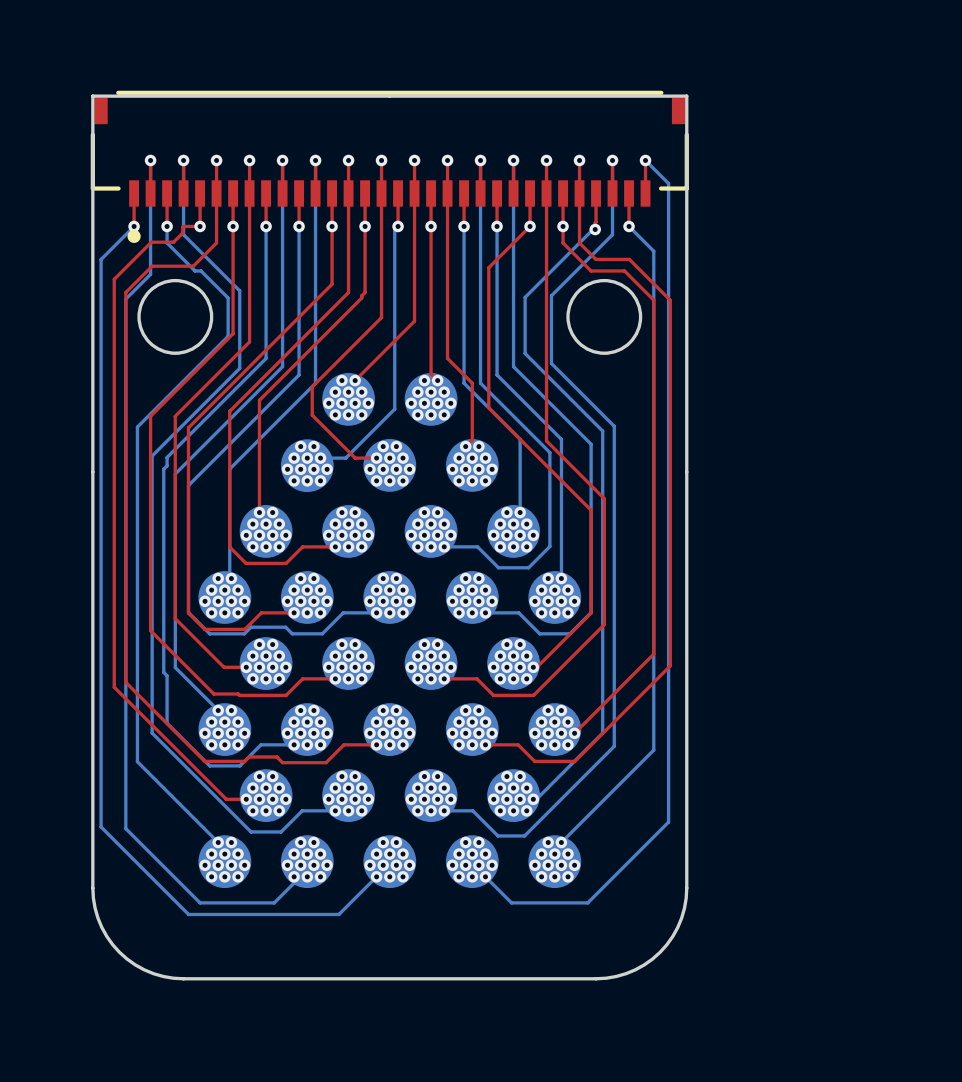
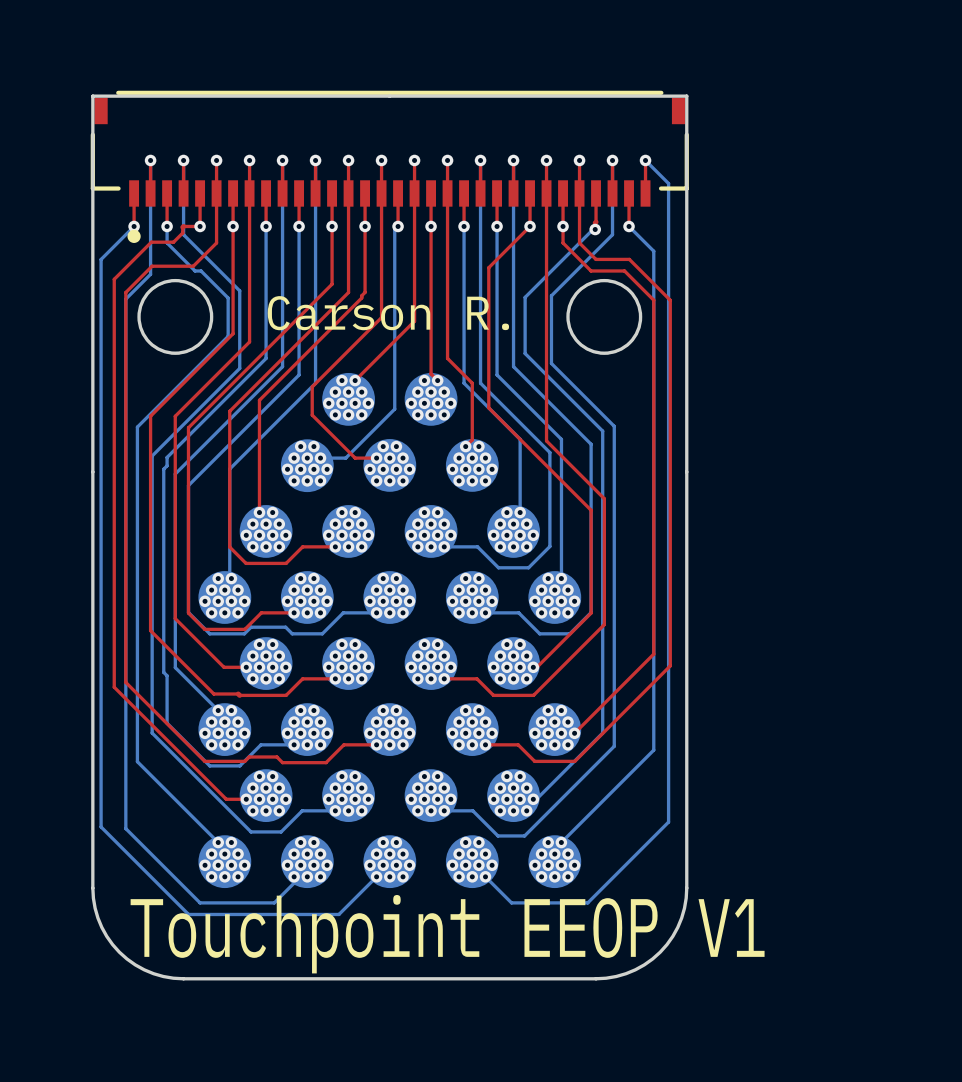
text: none -> Carson R. (388, 313)
text: none -> Touchpoint EEOP V1 (447, 934)

